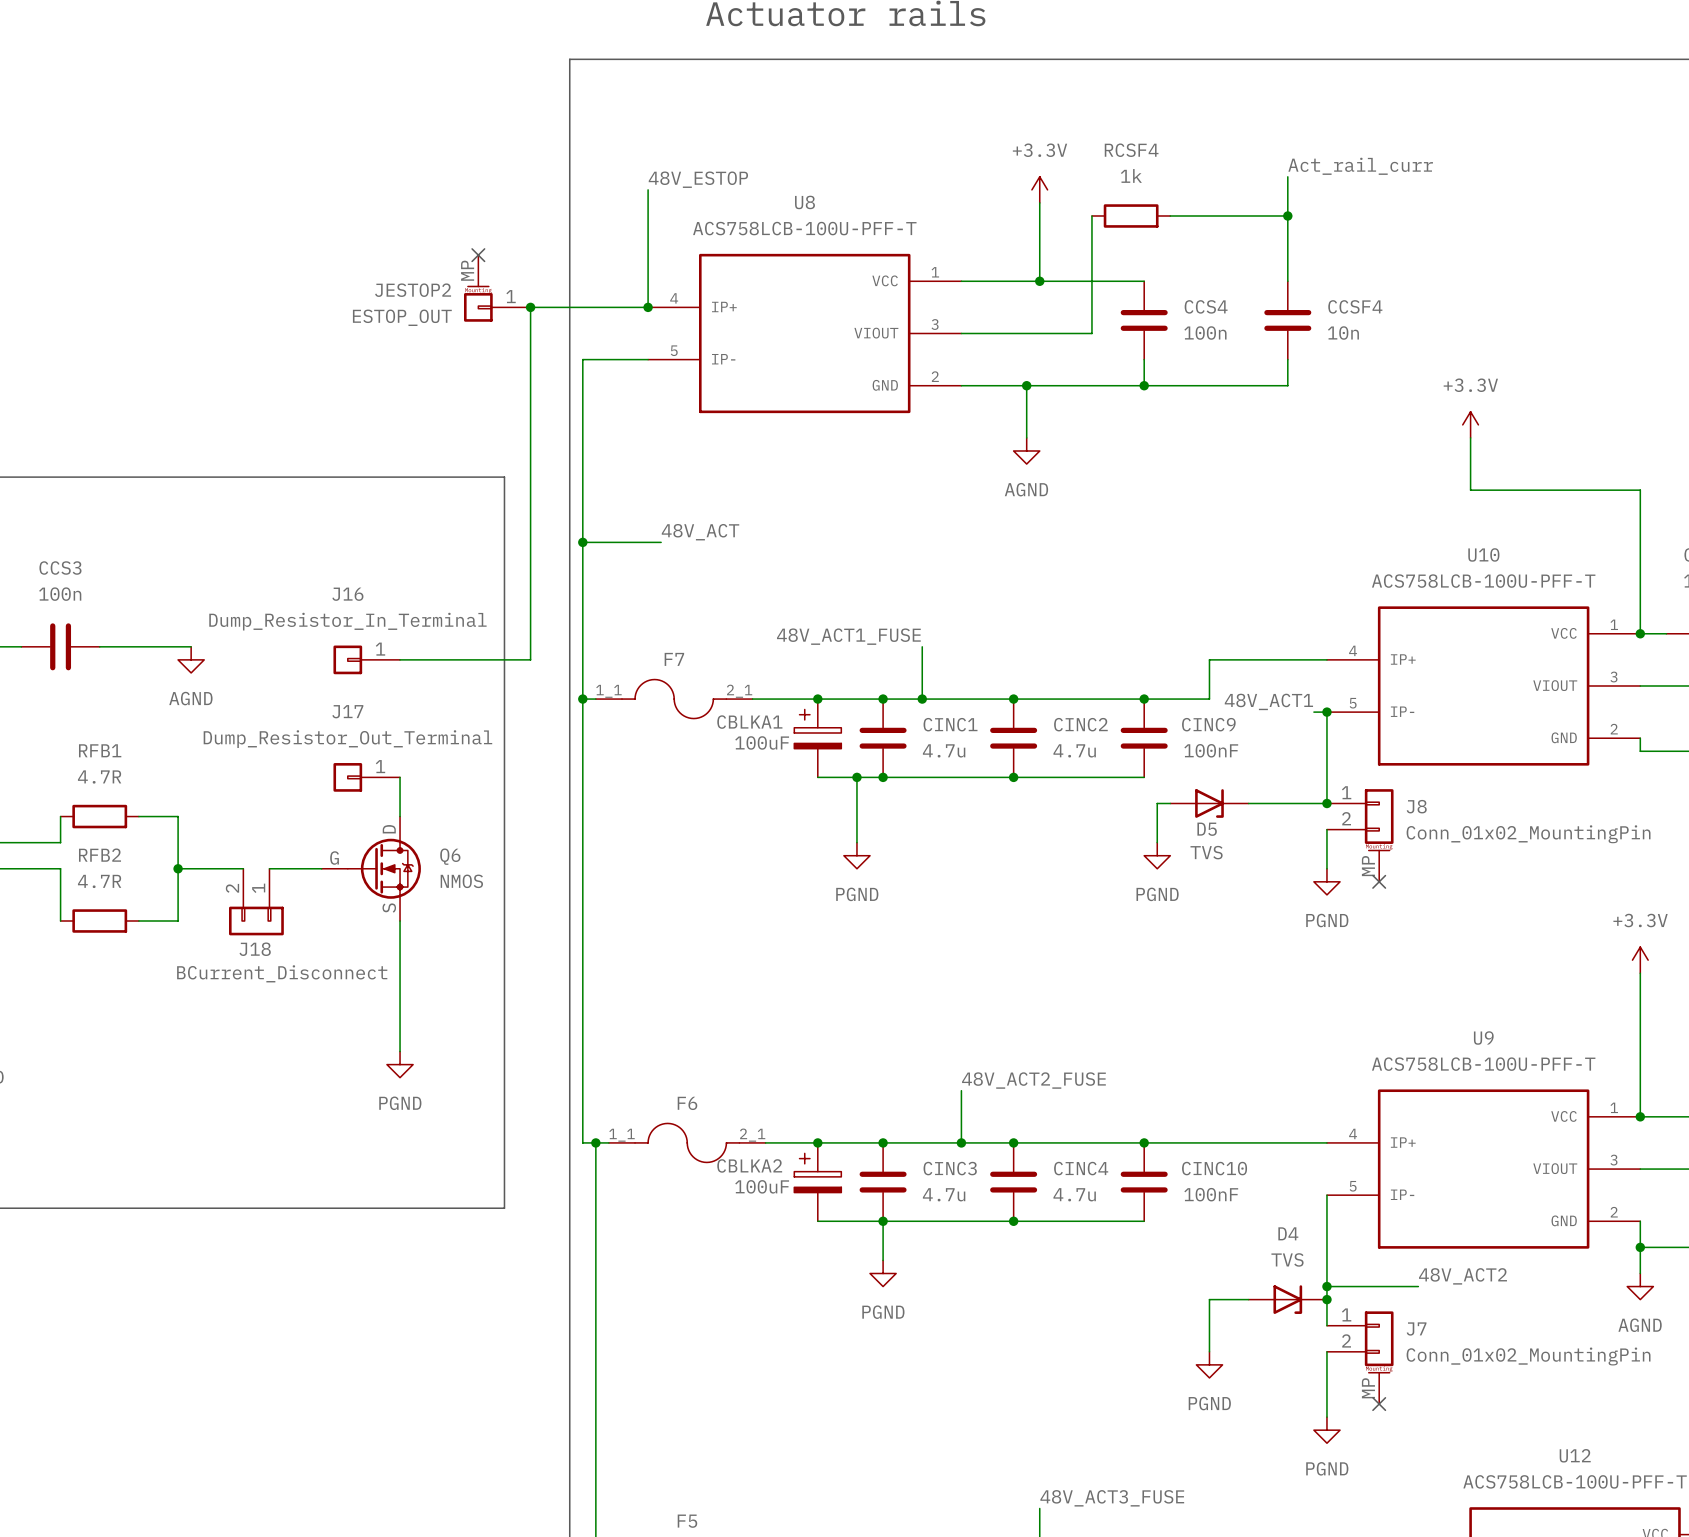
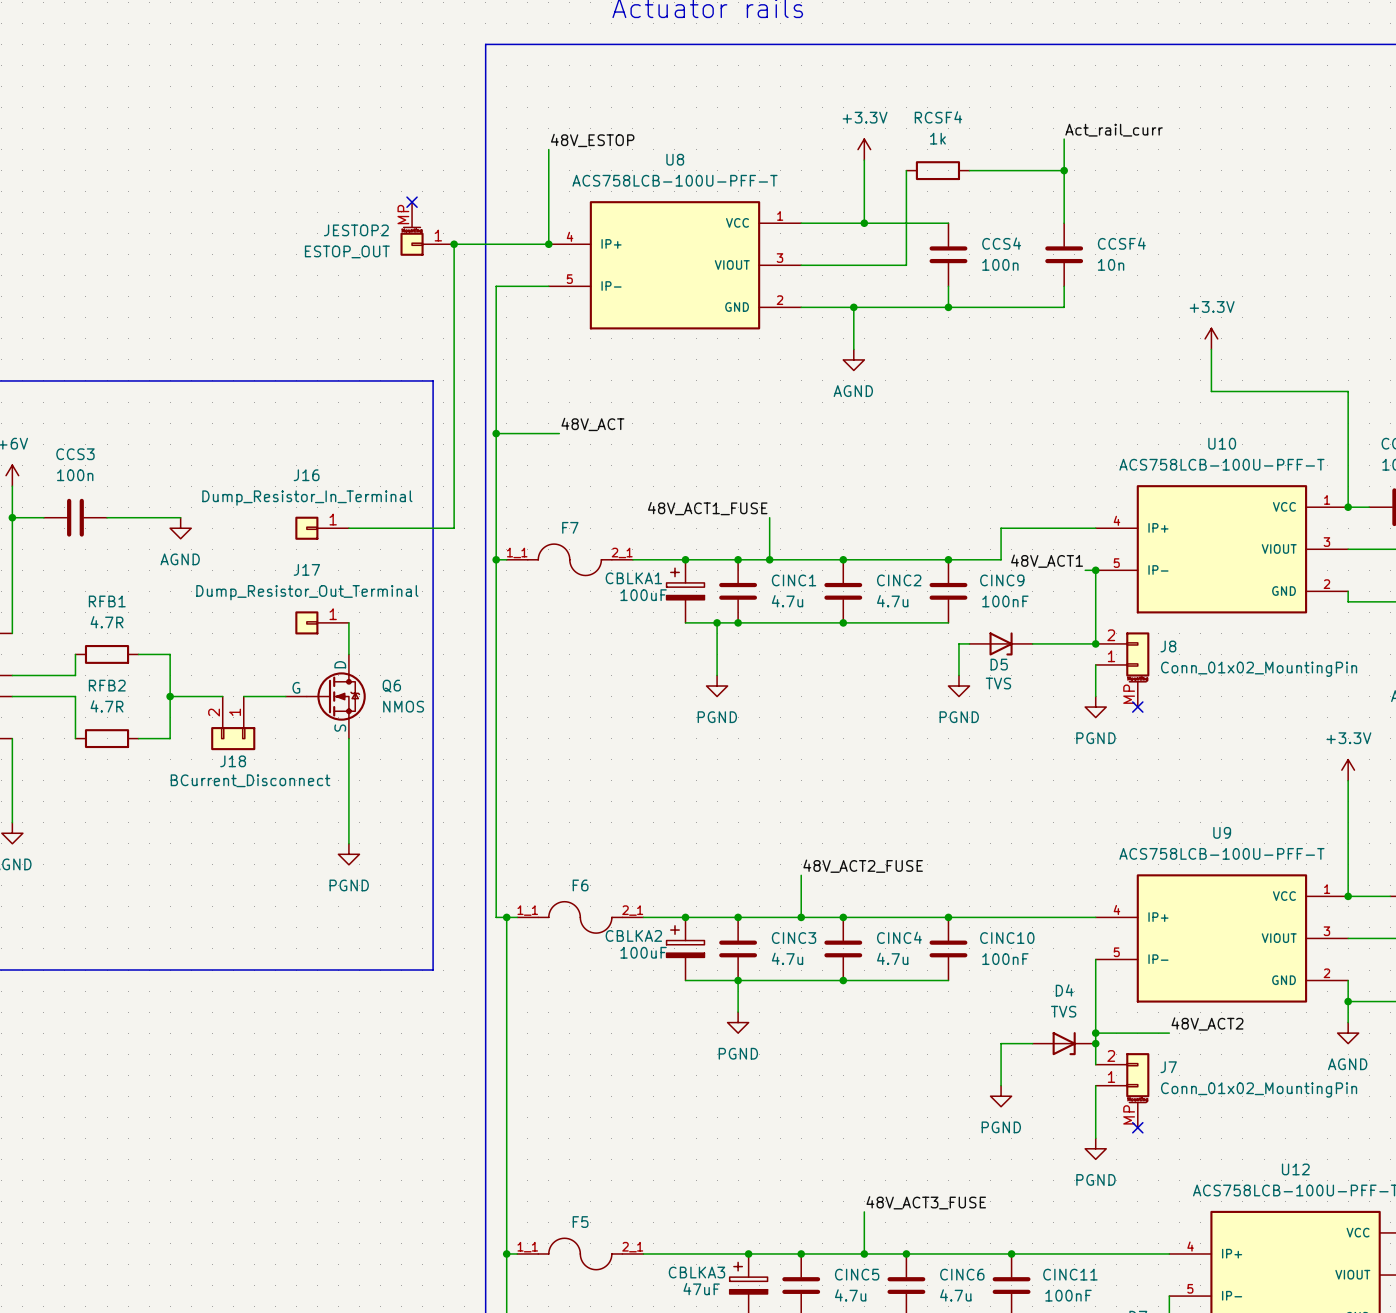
J8 pin number: 1 (1346, 792) -> 2 (1111, 635)
J8 pin number: 2 (1346, 818) -> 1 (1111, 656)
J7 pin number: 1 (1346, 1314) -> 2 (1111, 1055)
J7 pin number: 2 (1346, 1340) -> 1 (1111, 1077)

